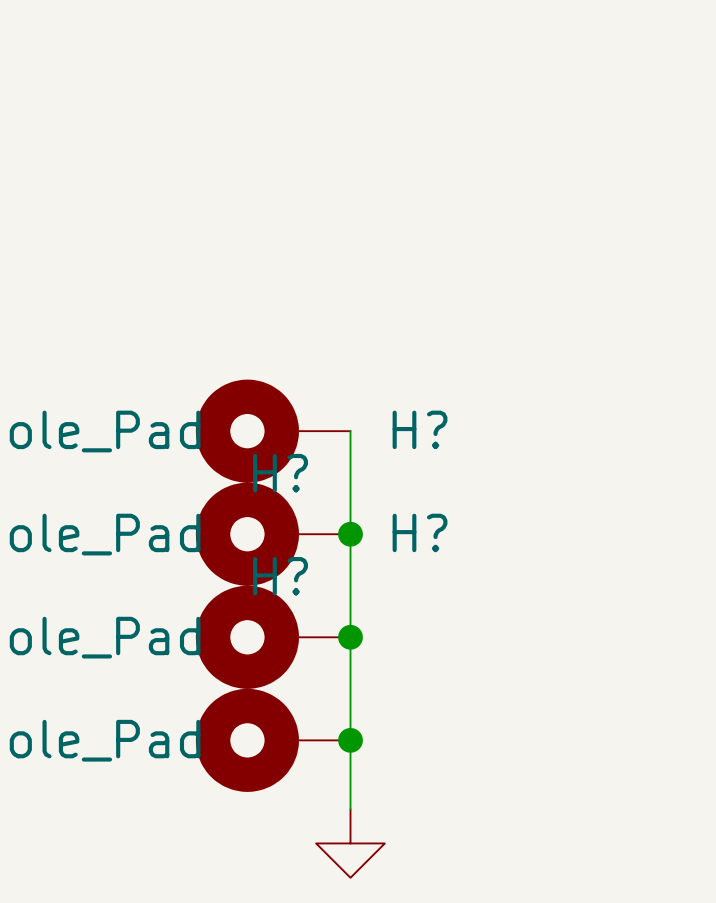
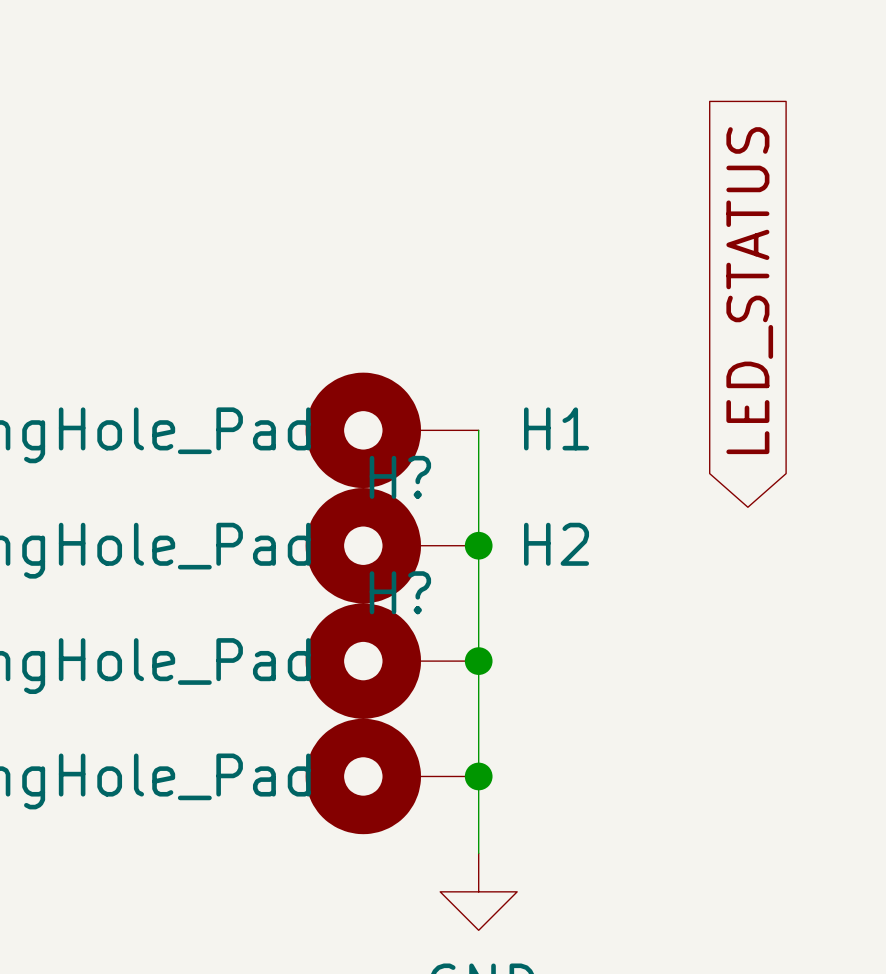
global label: none -> LED_STATUS (749, 290)
H? name: H? (420, 429) -> H1 (556, 428)
H? name: H? (420, 532) -> H2 (556, 544)

